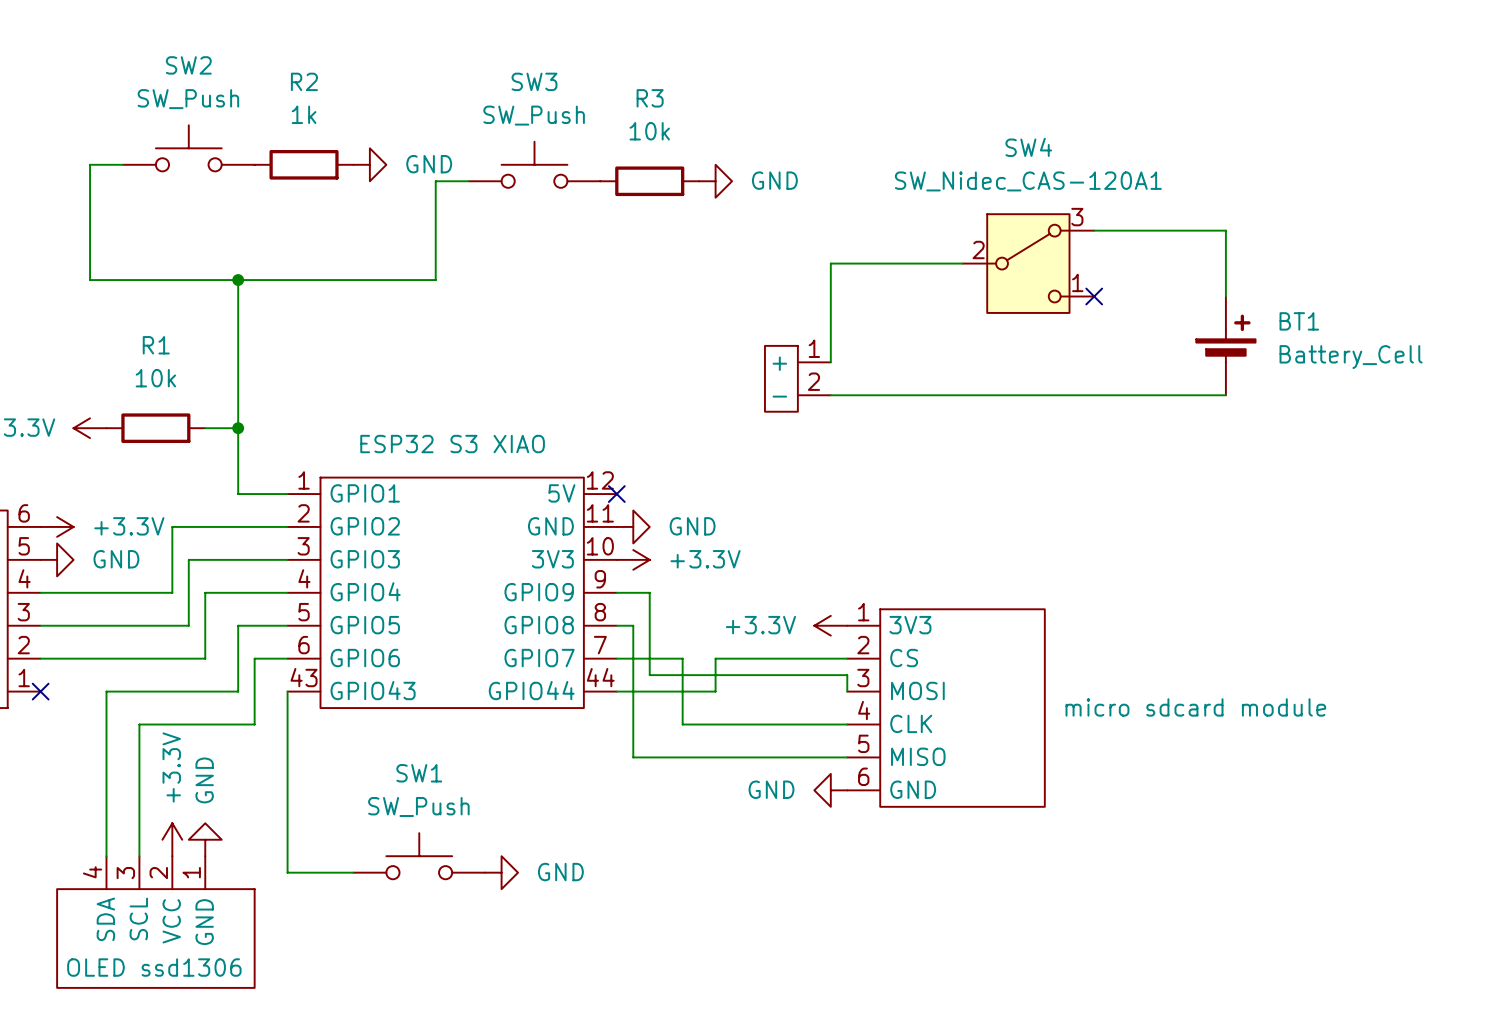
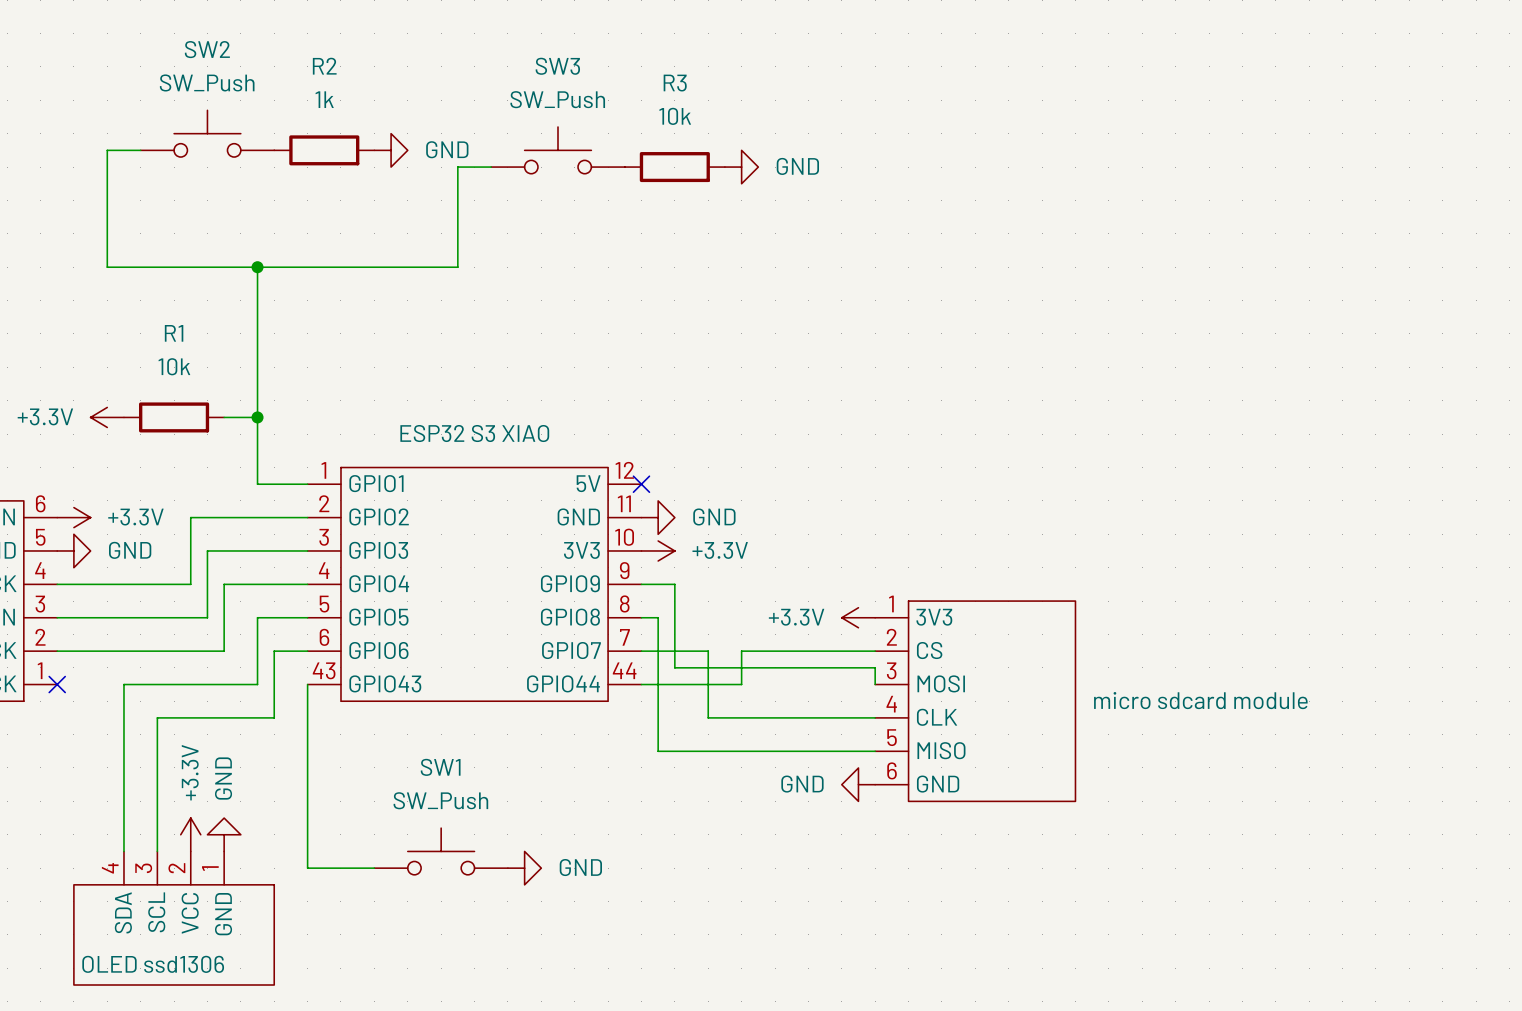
wire: (1094, 230) (1225, 230) (1225, 296) -> none
wire: (962, 263) (830, 263) (830, 362) -> none
SW4: SW_Nidec_CAS-120A1 (1028, 263) -> none
no-connect mark: (1094, 296) -> none
BT1: Battery_Cell (1225, 345) -> none
part: (797, 378) -> none
wire: (830, 395) (1225, 395) -> none

